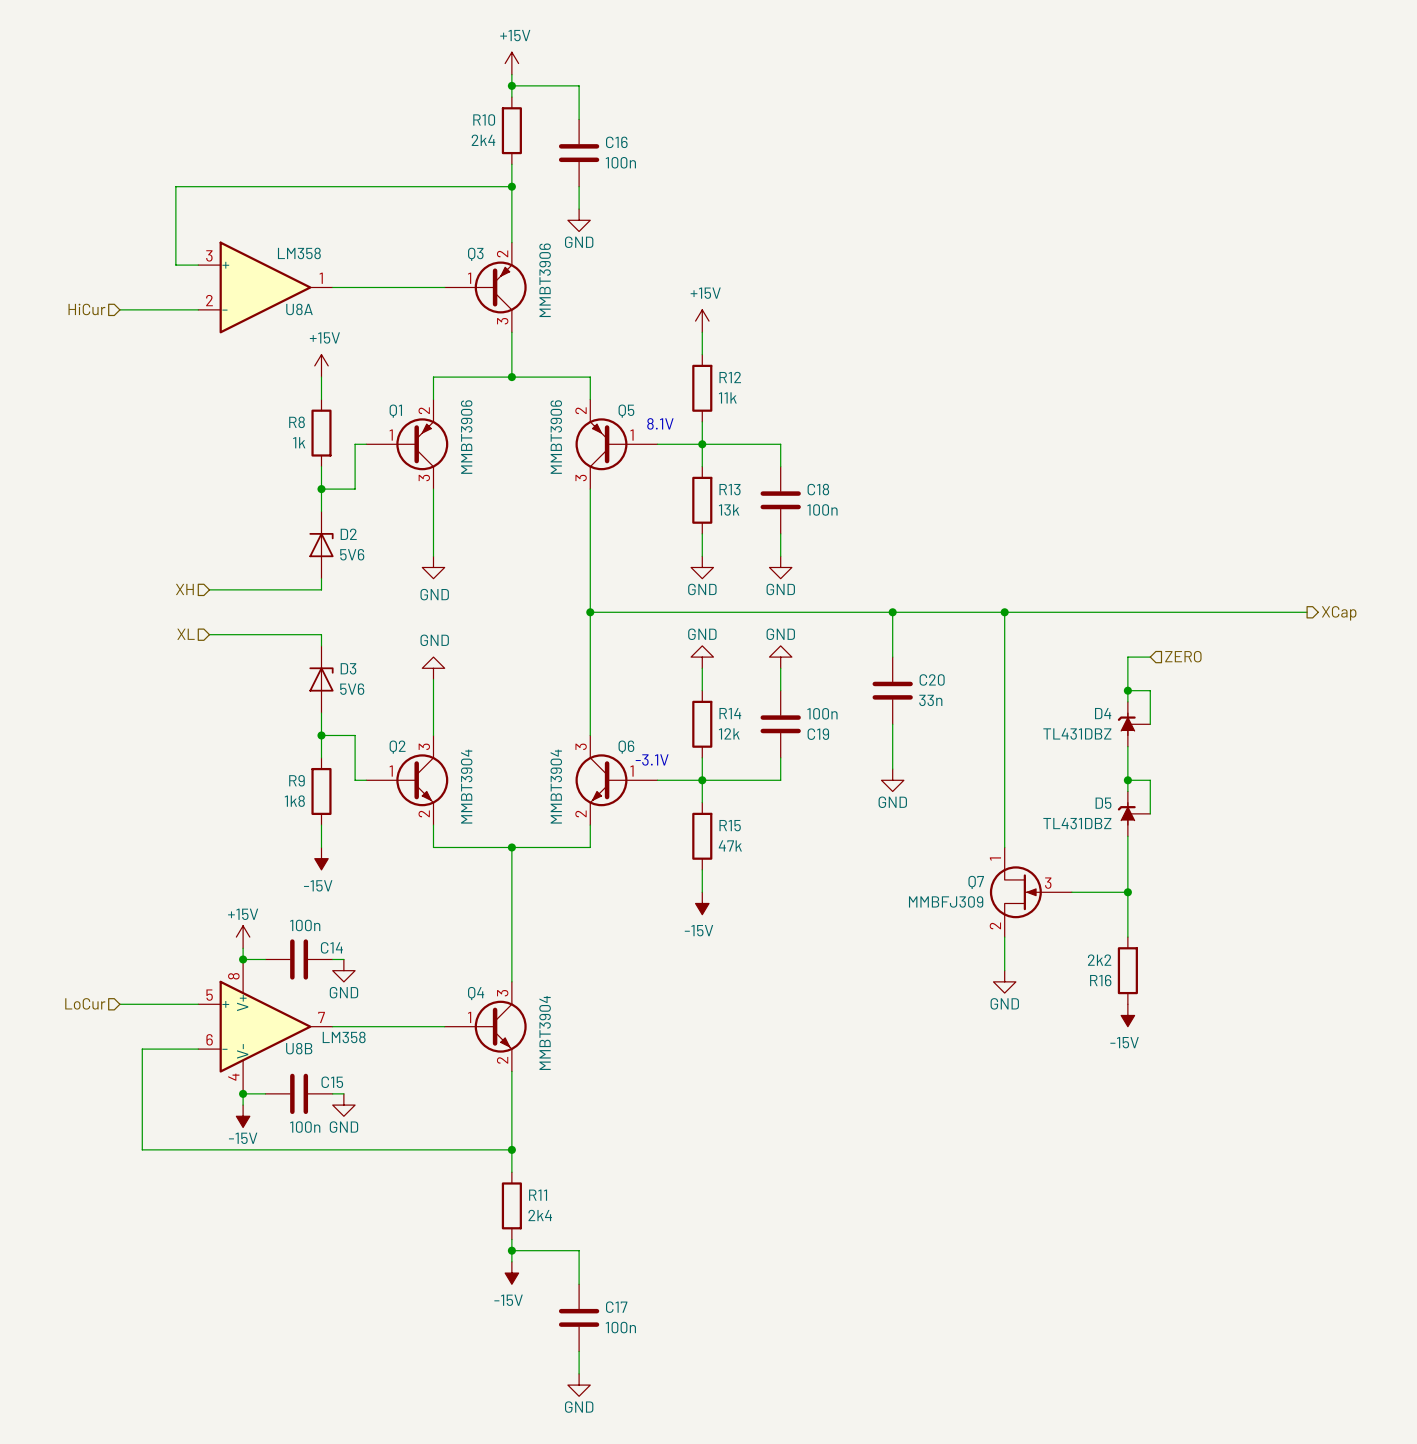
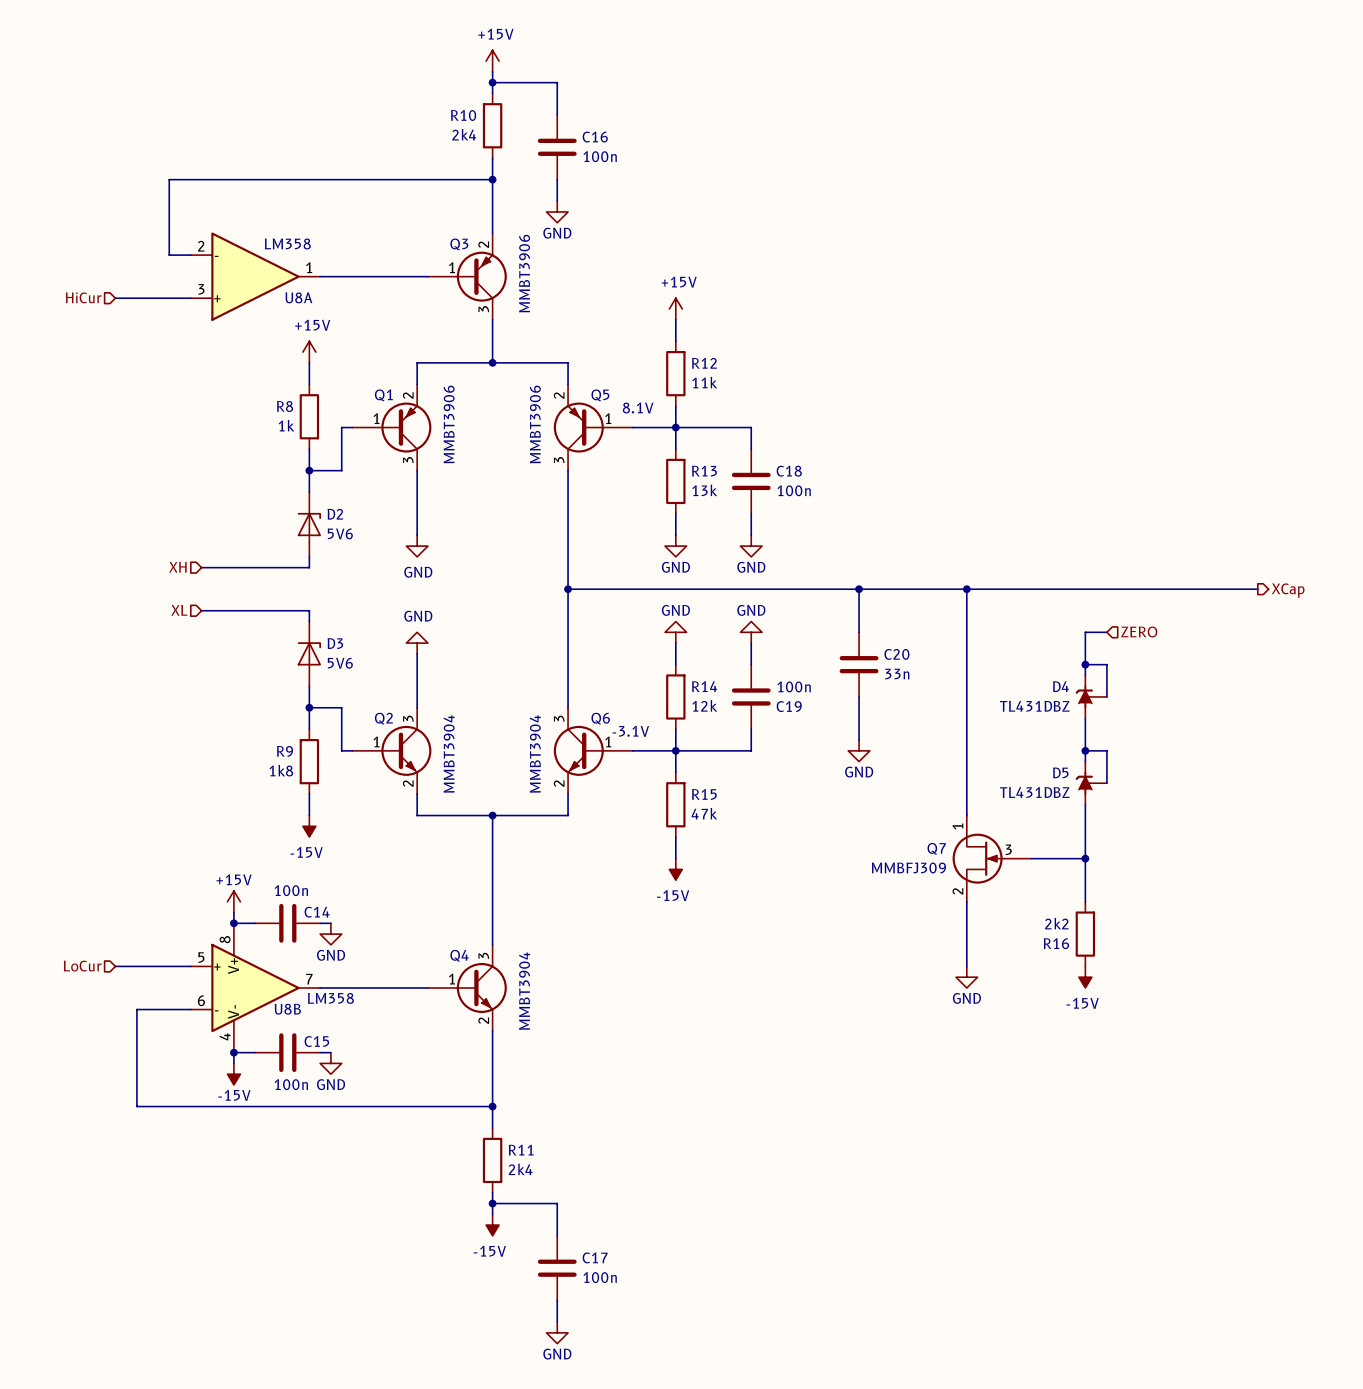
U8A flip: as is (265, 287) -> up-down (255, 276)
wire: none -> (966, 934) (966, 966)
power symbol position: GND (1004, 981) -> GND (966, 977)

